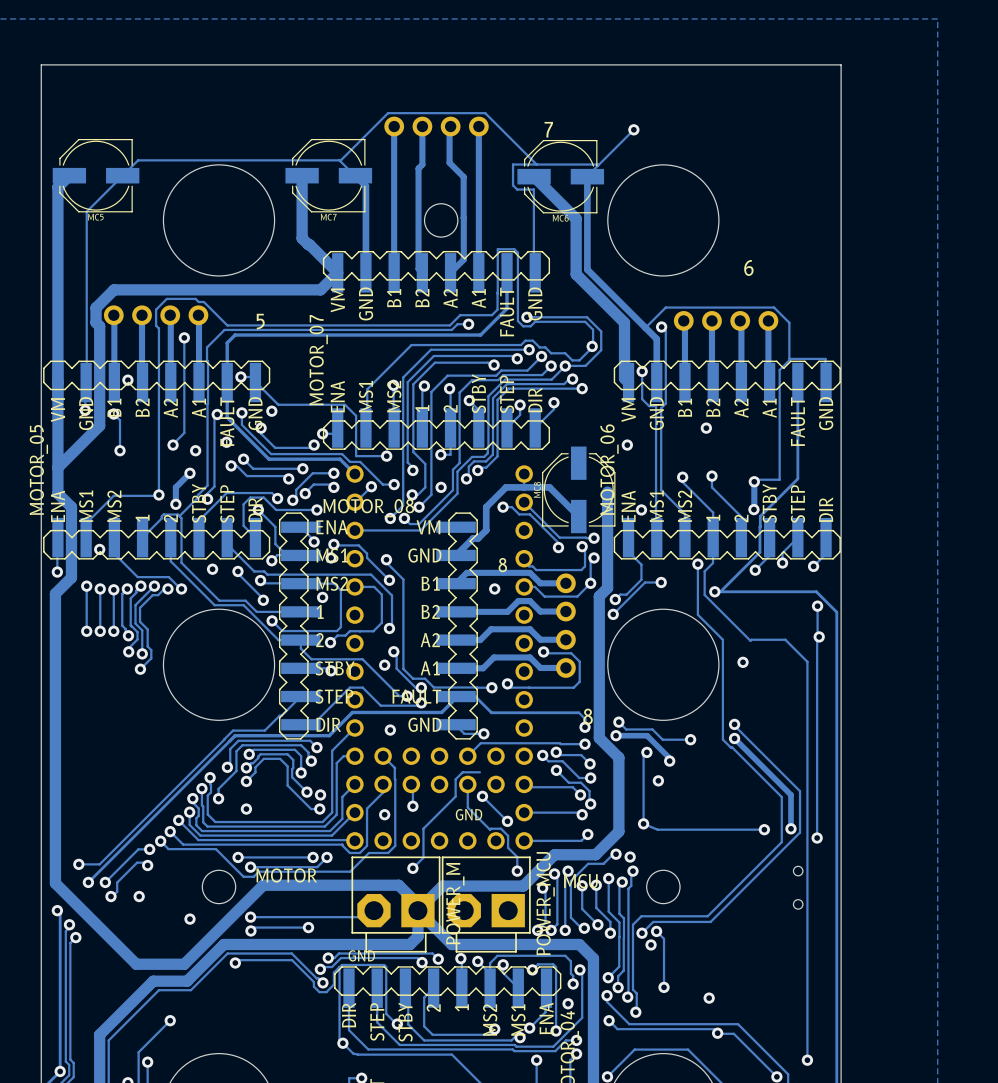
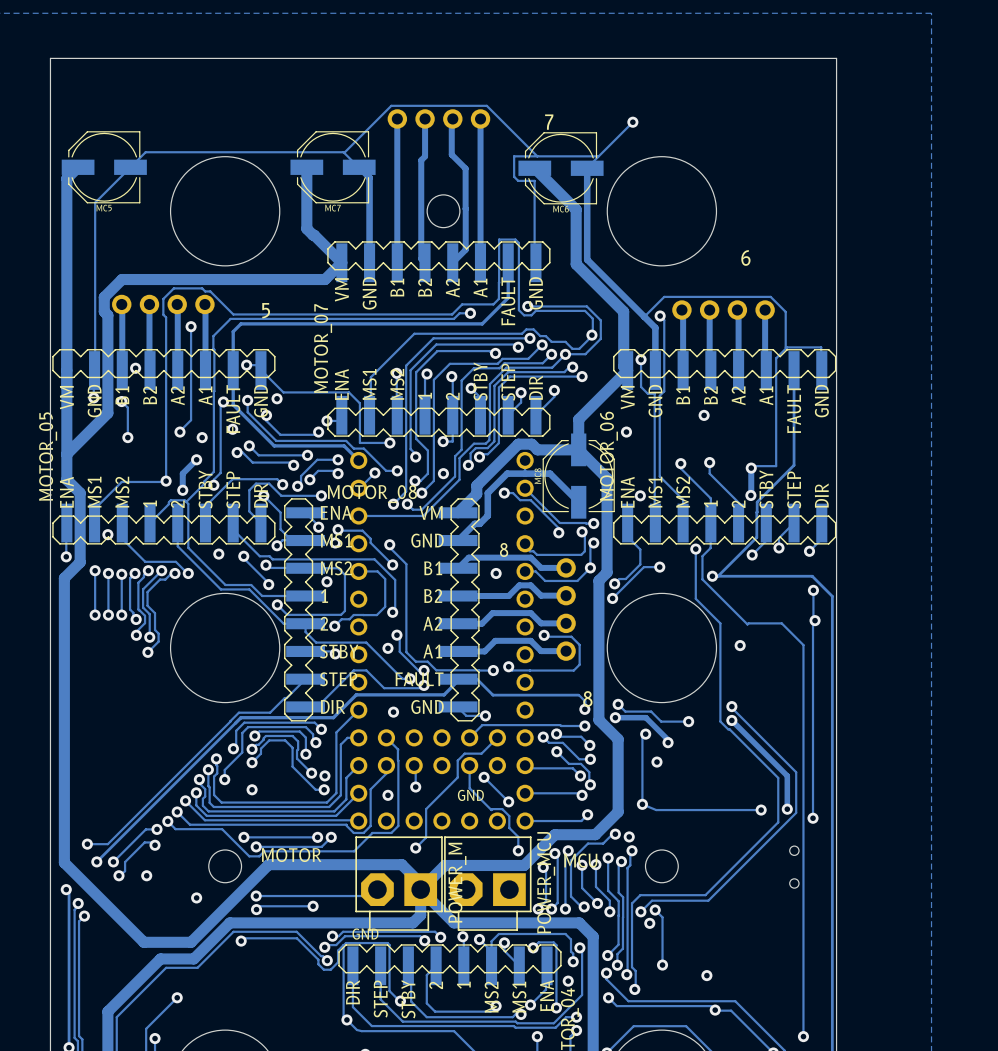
track: none -> (627, 370) (578, 419) (578, 449)
track: none -> (578, 449) (537, 449) (531, 444) (518, 444) (476, 485) (476, 494) (458, 512)
track: none -> (578, 449) (607, 478)
track: none -> (497, 737) (481, 753)

